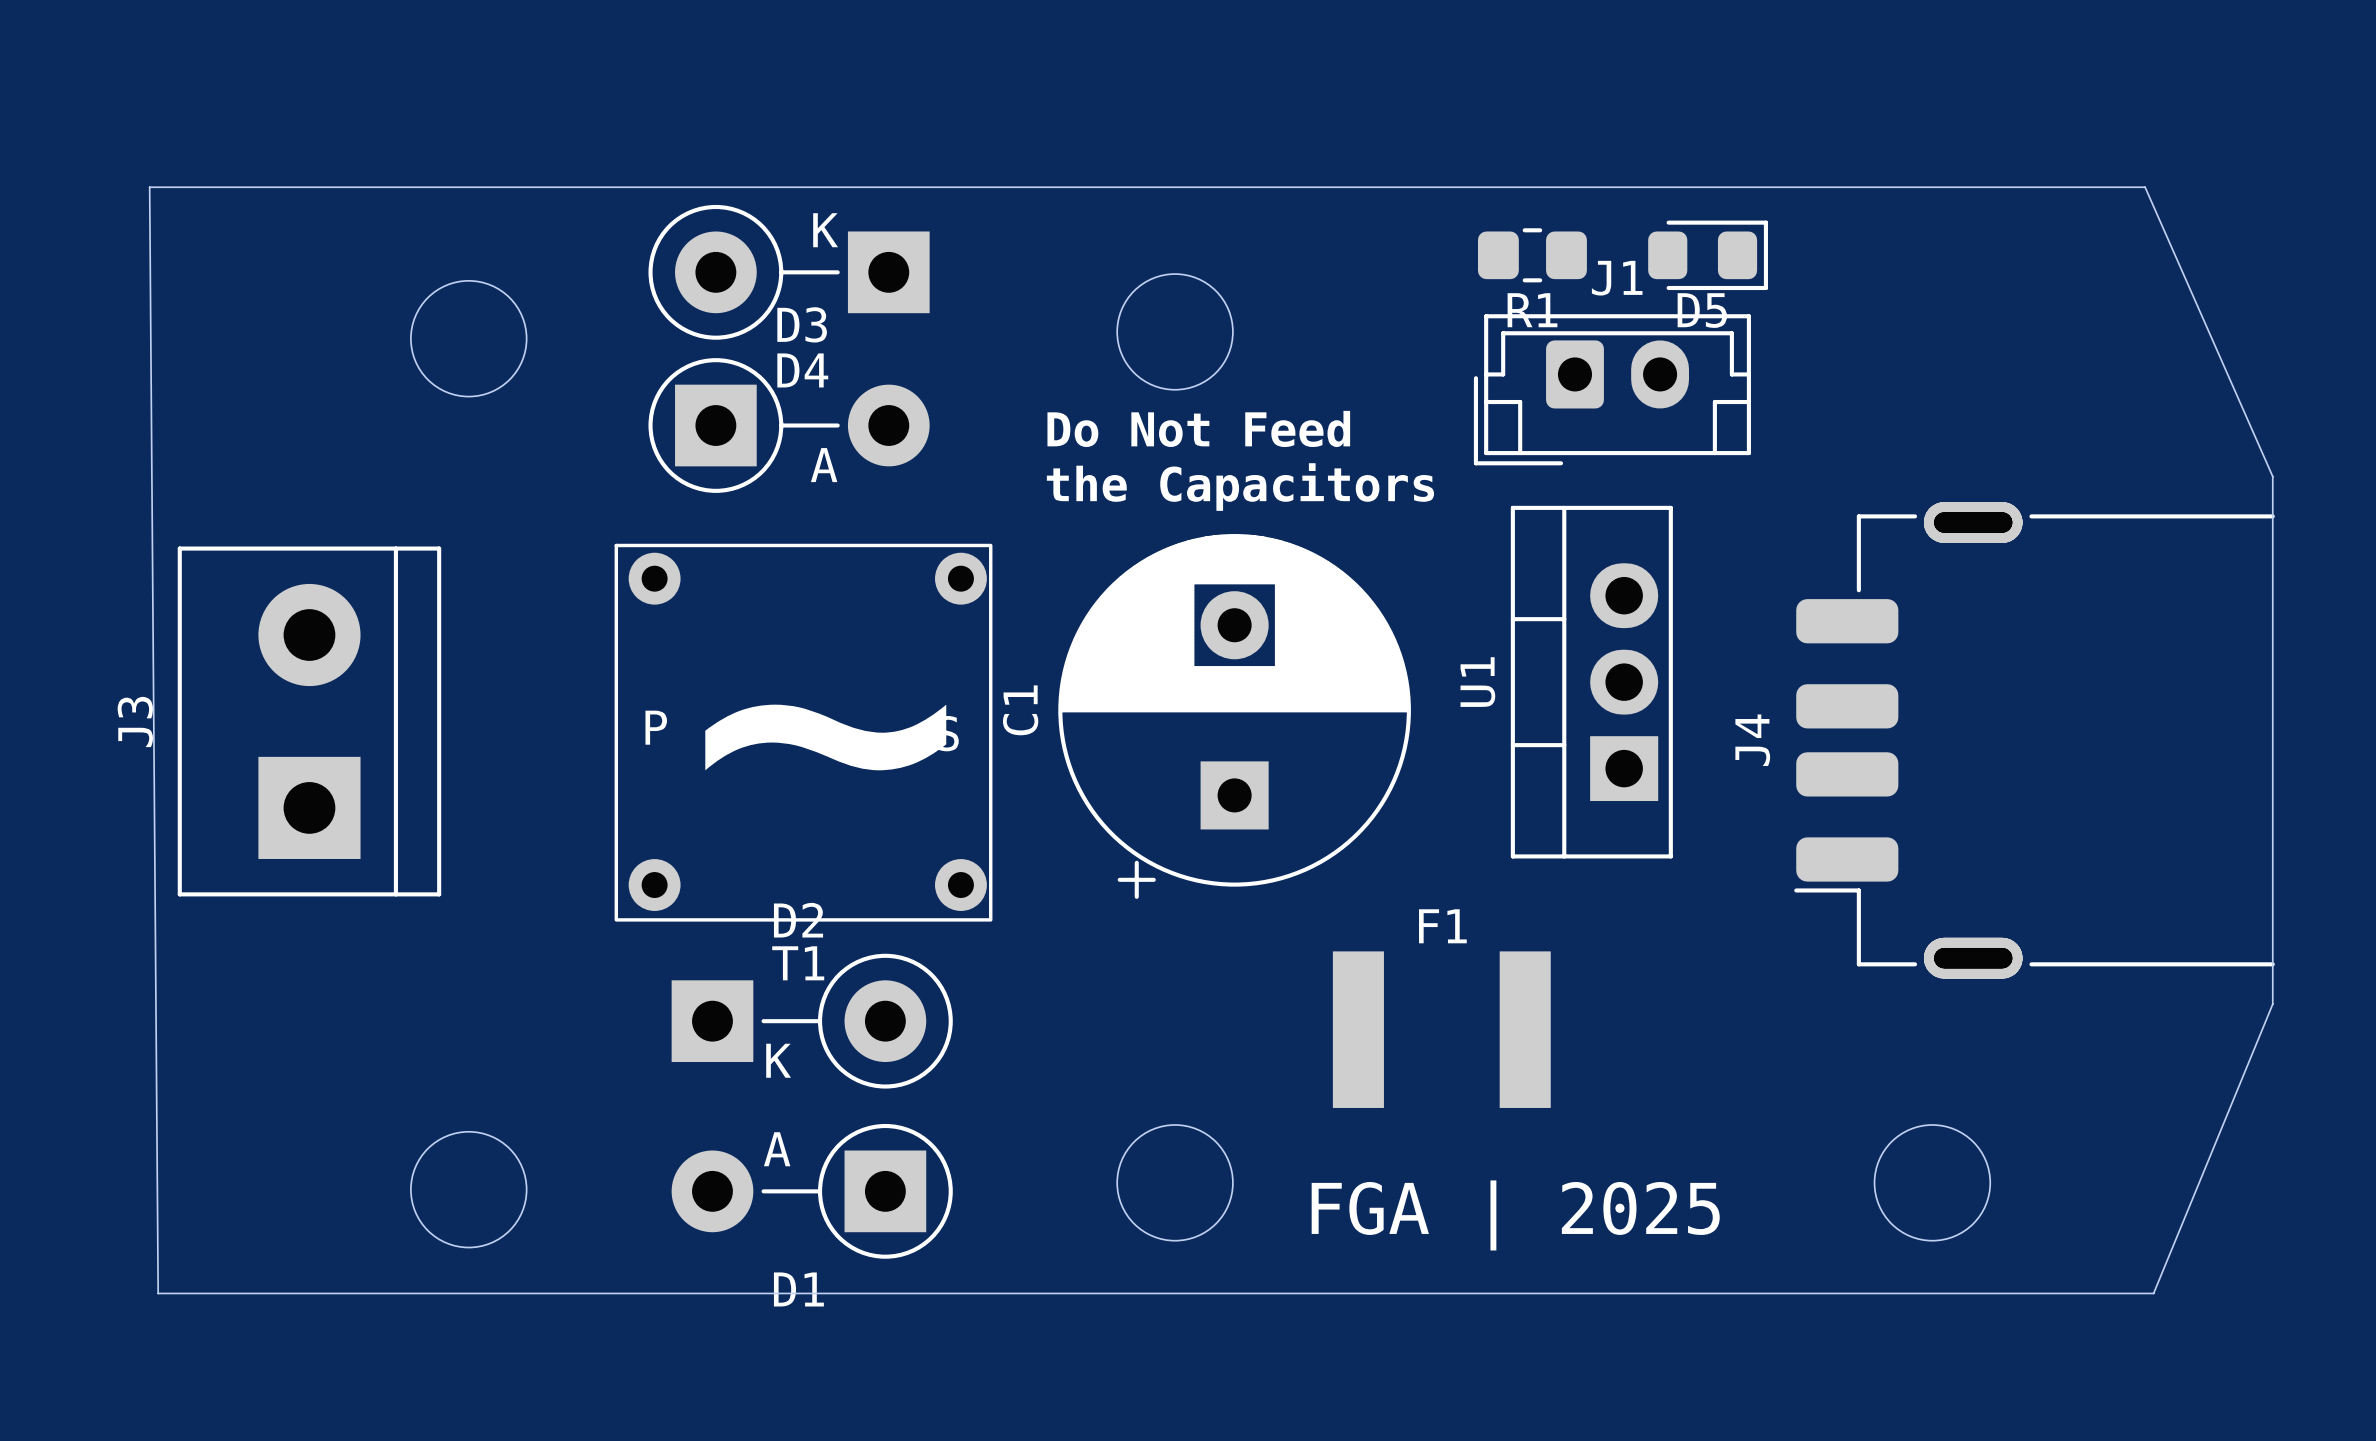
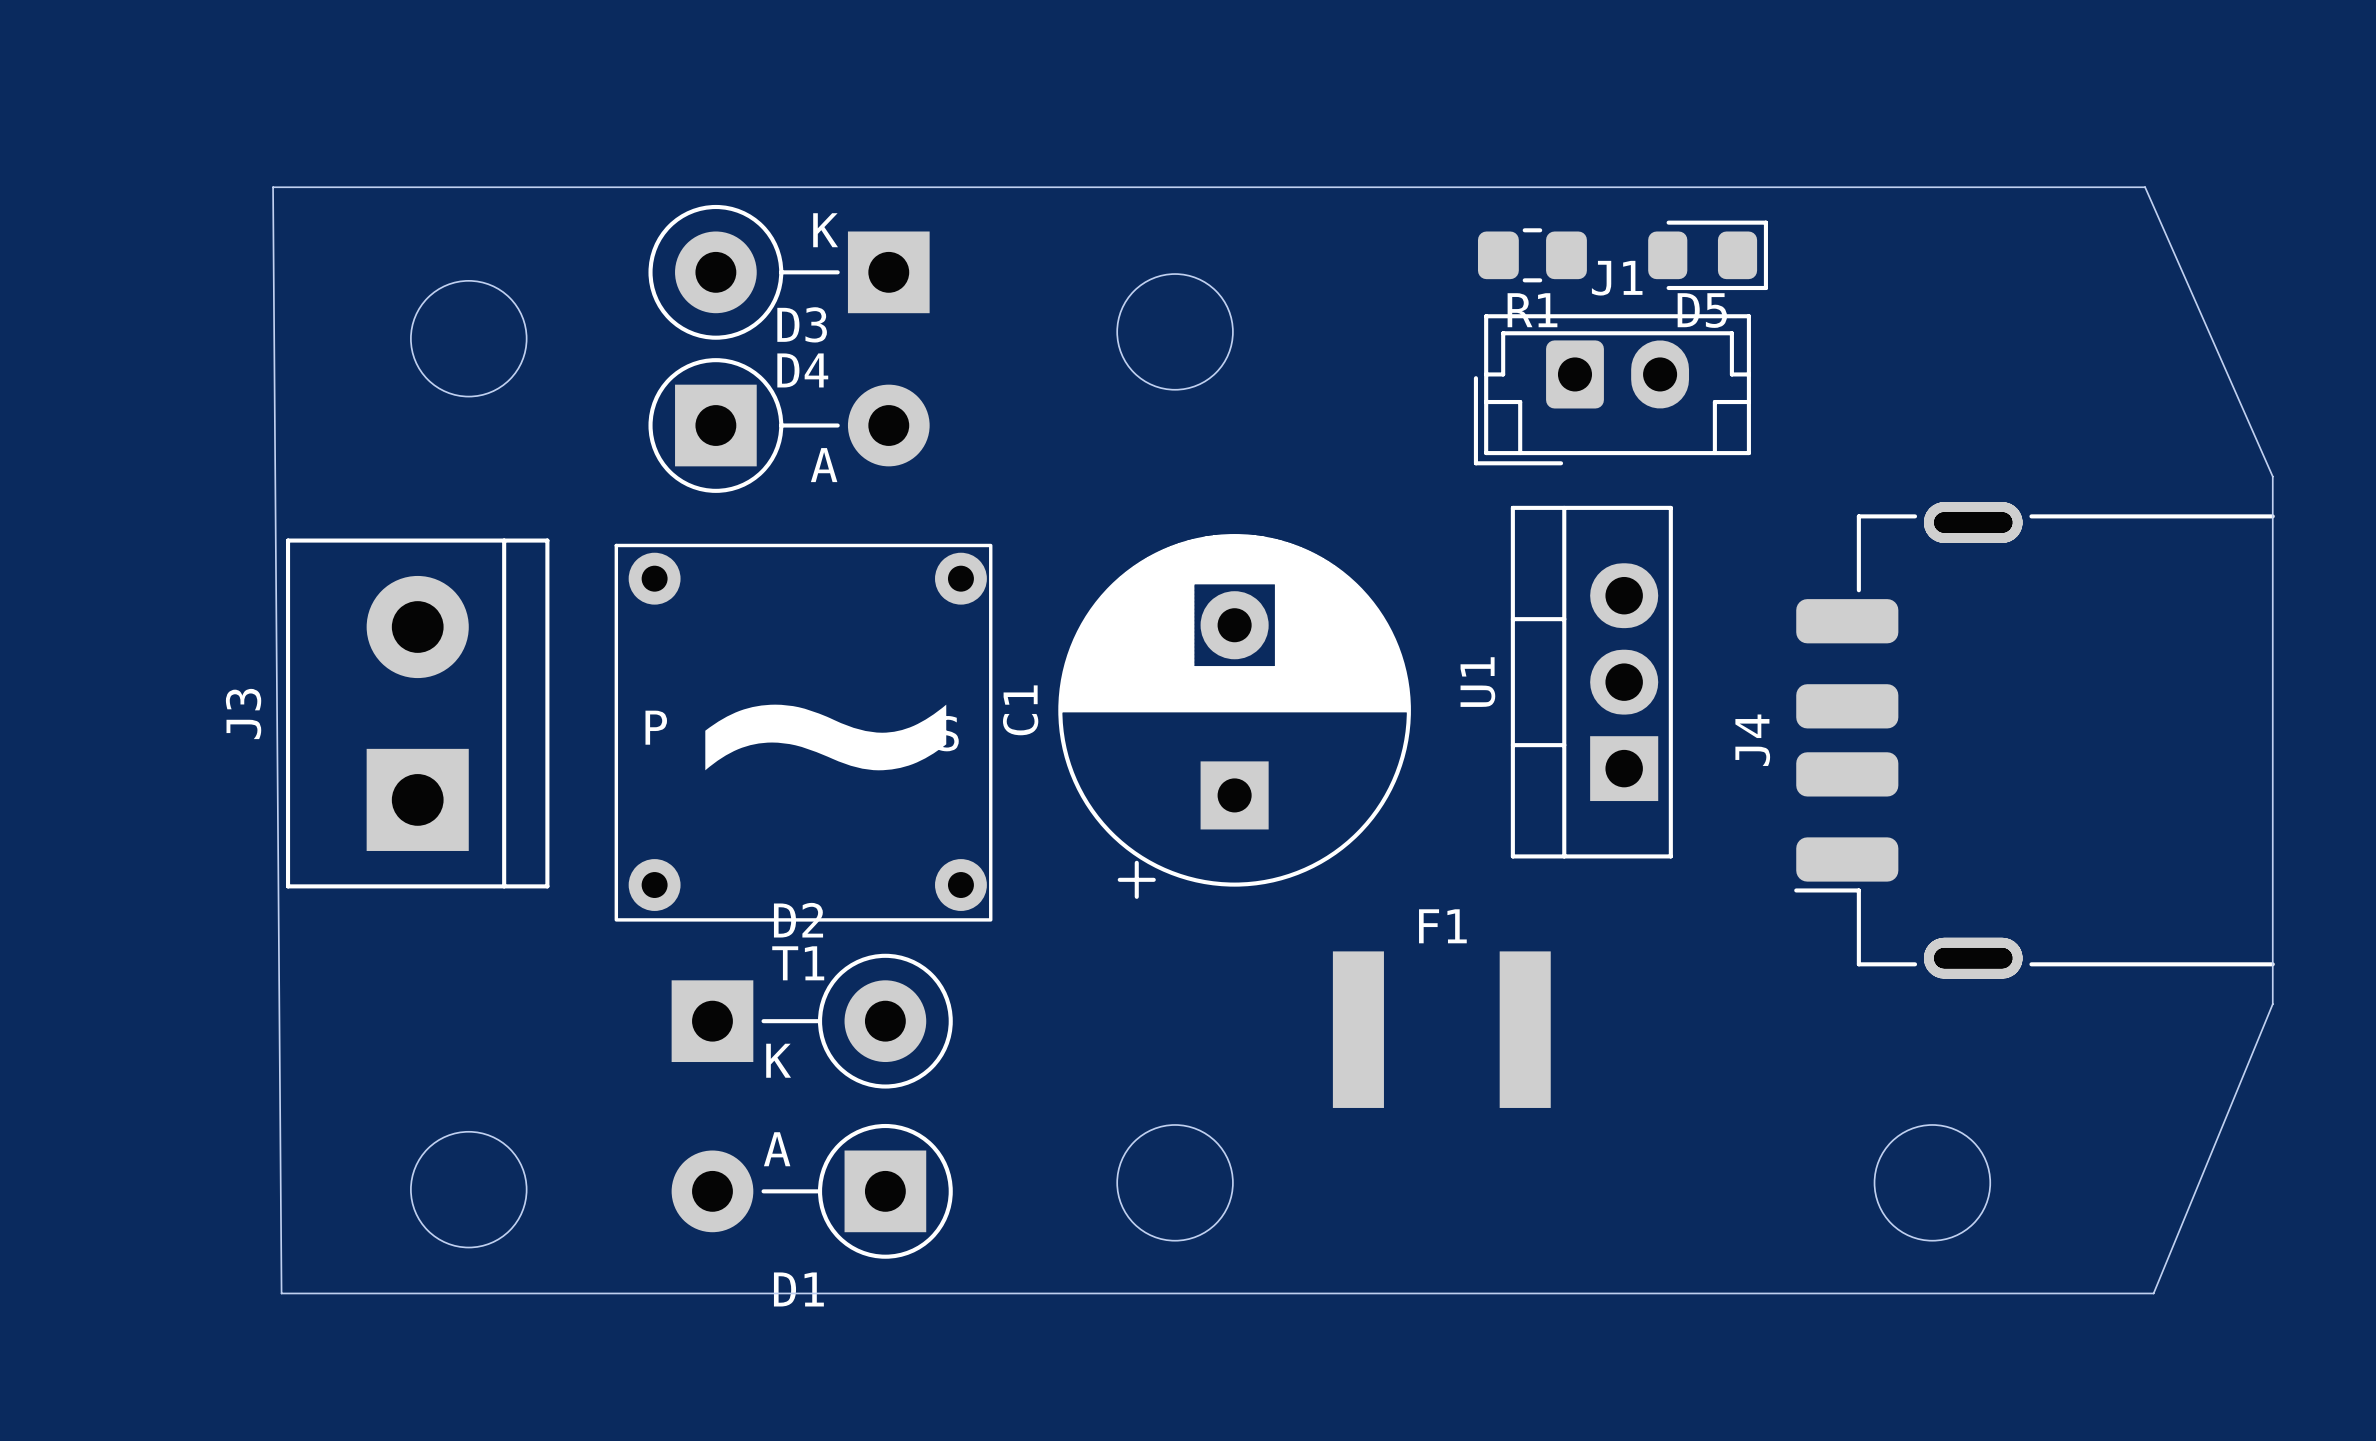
board edge: (273, 187) (149, 187) (158, 1293) (281, 1293) -> (273, 187) (281, 1293)
text: Do Not Feed (1198, 428) -> none
text: the Capacitors (1240, 487) -> none
J3 position: (309, 721) -> (417, 713)
text: FGA | 2025 (1515, 1215) -> none

